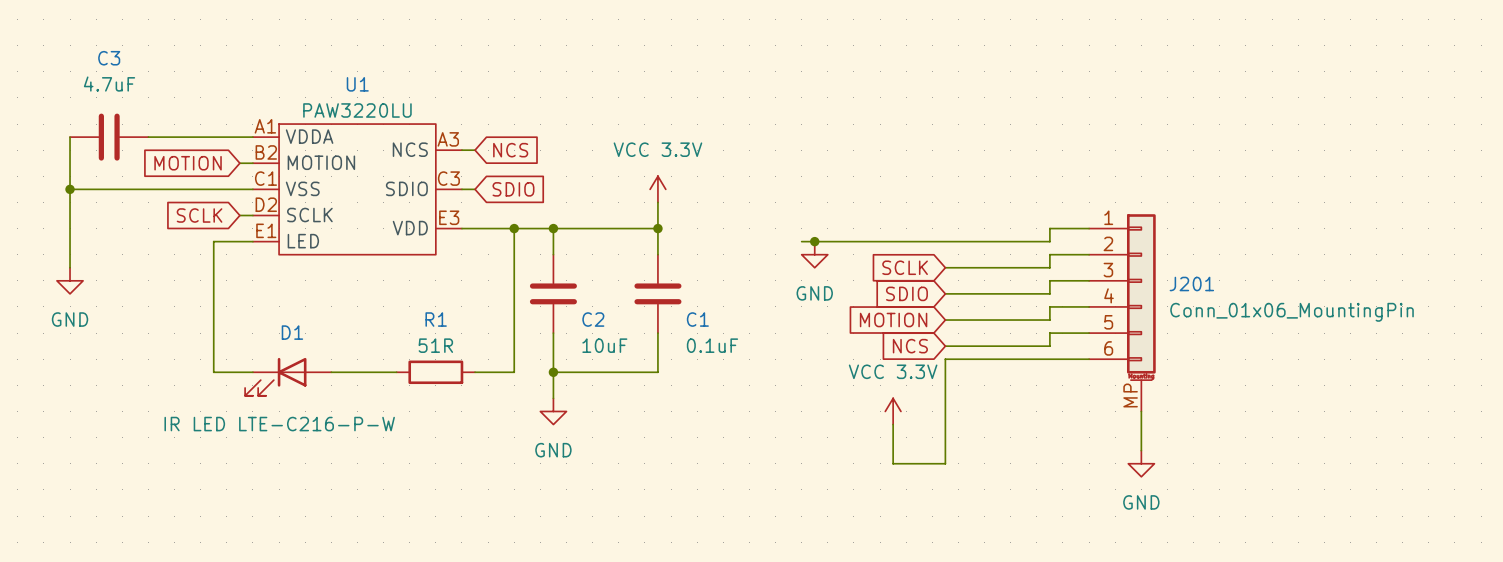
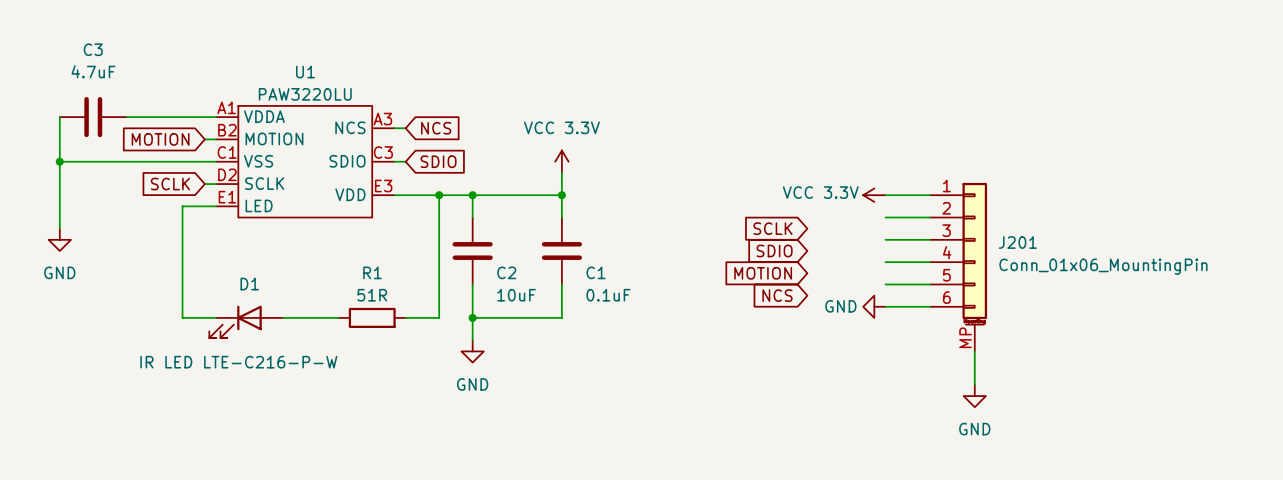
wire: (1049, 228) (1049, 241) (801, 241) -> (896, 195) (885, 195)
junction: (814, 241) -> none
power symbol rotation: 0° (814, 254) -> 90° clockwise (874, 306)
power symbol position: GND (814, 254) -> GND (874, 306)
wire: (1049, 254) (1049, 267) (945, 267) -> (896, 217) (885, 217)
wire: (1049, 280) (1049, 293) (945, 293) -> (896, 239) (885, 239)
wire: (1049, 306) (1049, 320) (945, 320) -> (896, 262) (885, 262)
wire: (1049, 333) (1049, 346) (945, 346) -> (896, 284) (885, 284)
wire: (1036, 359) (945, 359) (945, 463) (893, 463) (893, 424) -> none
power symbol text position: VCC 3.3V (893, 371) -> VCC 3.3V (820, 192)
power symbol rotation: 0° (893, 411) -> 90° counterclockwise (874, 195)
power symbol position: VCC 3.3V (893, 411) -> VCC 3.3V (874, 195)

